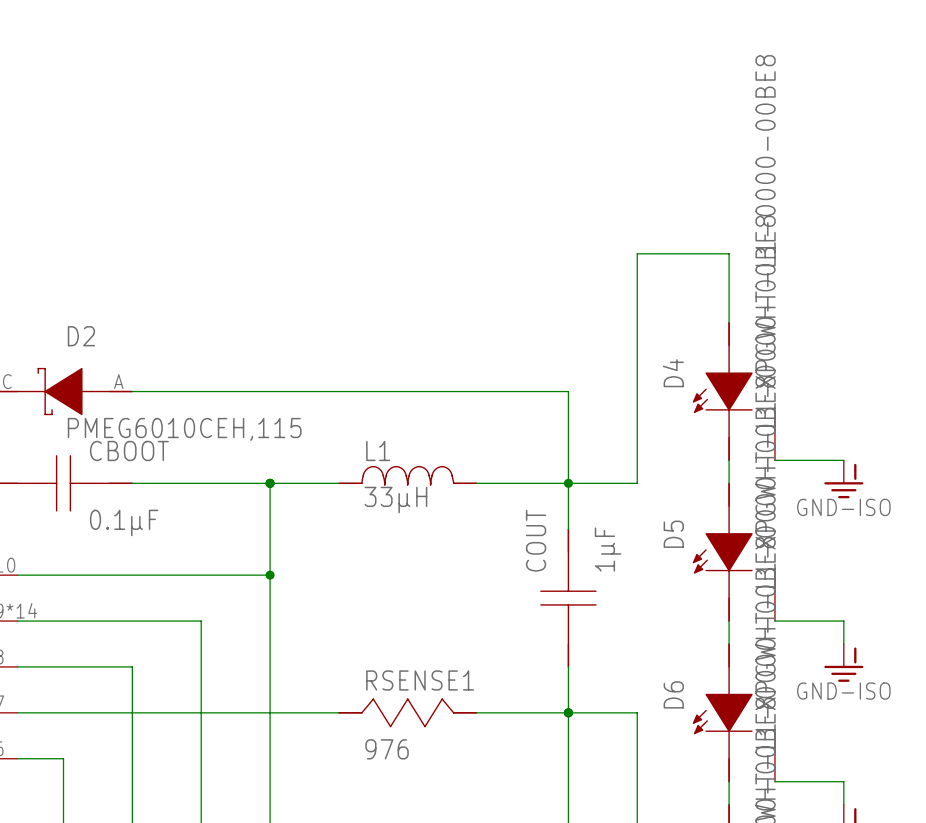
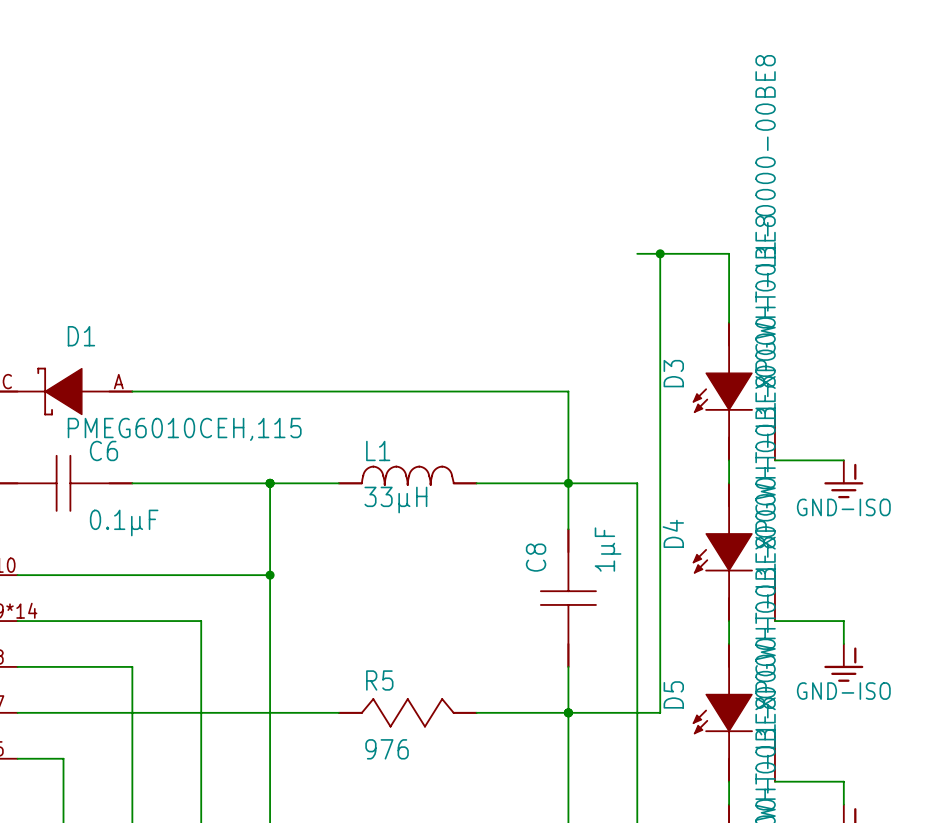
wire: (637, 253) (637, 483) -> (660, 253) (660, 712) (637, 712) (637, 483)
junction: none -> (660, 253)
D2 name: D2 (81, 336) -> D1 (81, 336)
D4 name: D4 (673, 373) -> D3 (673, 373)
CBOOT name: CBOOT (129, 450) -> C6 (103, 450)
D5 name: D5 (673, 534) -> D4 (673, 533)
COUT name: COUT (536, 540) -> C8 (536, 557)
RSENSE1 name: RSENSE1 (420, 680) -> R5 (379, 680)
D6 name: D6 (673, 694) -> D5 (673, 694)

